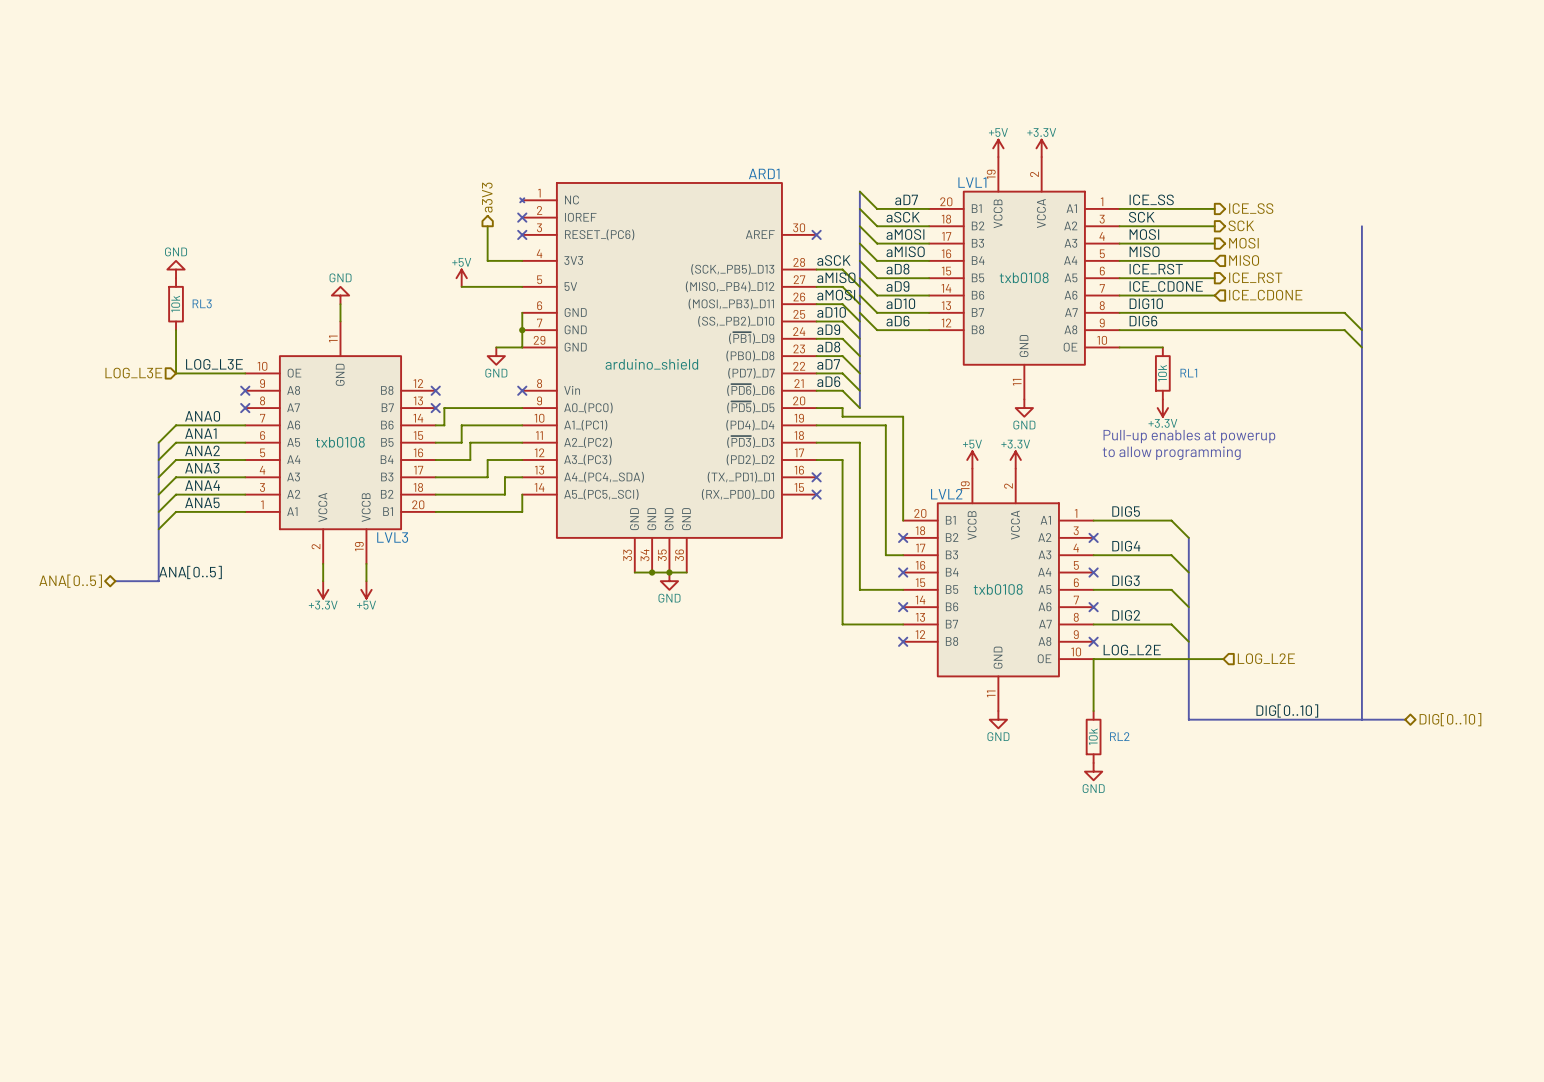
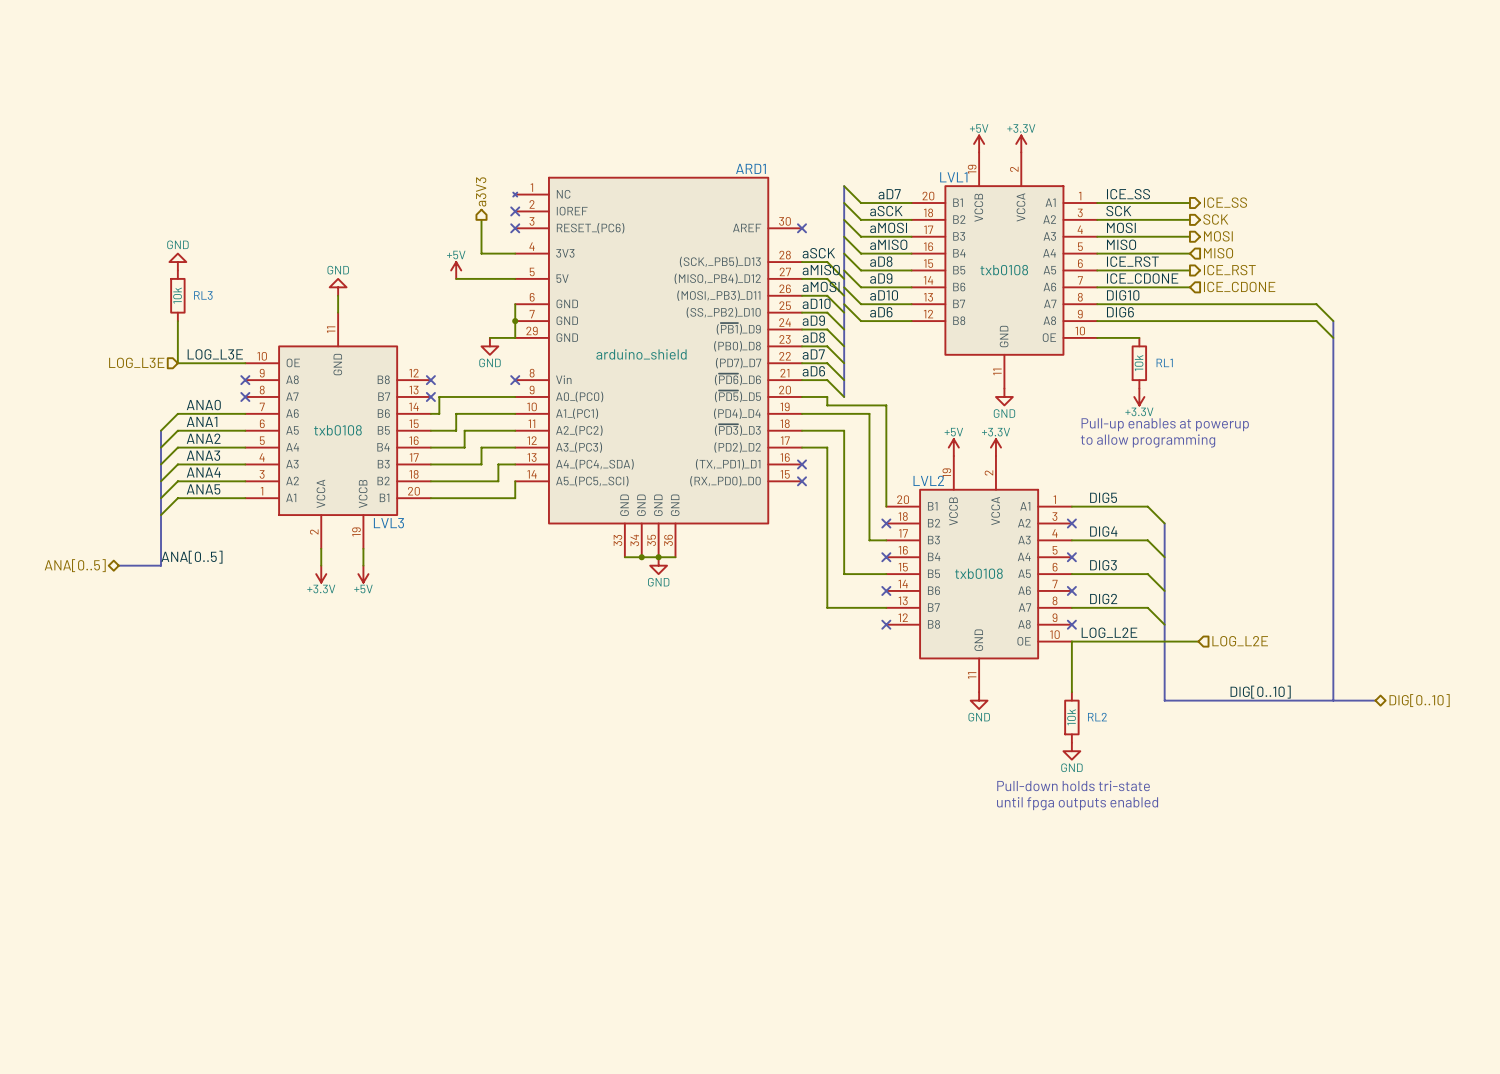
bus: (1361, 226) (1361, 330) -> none
text: none -> Pull-down holds tri-state (1073, 786)
text: none -> until fpga outputs enabled (1077, 803)

